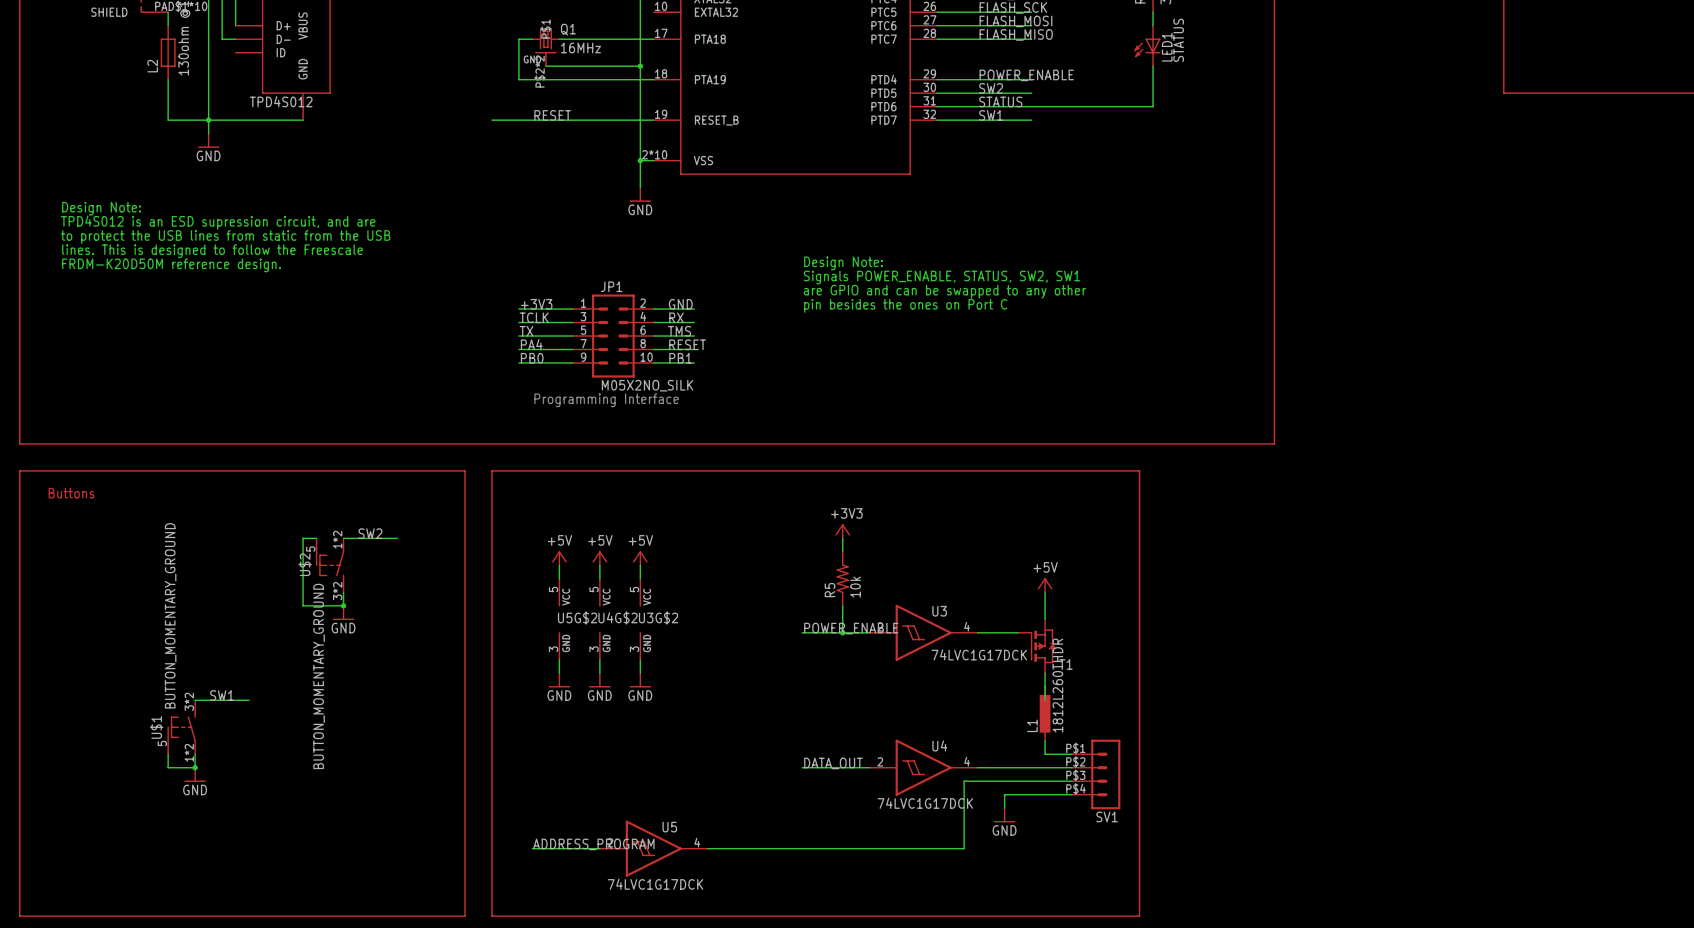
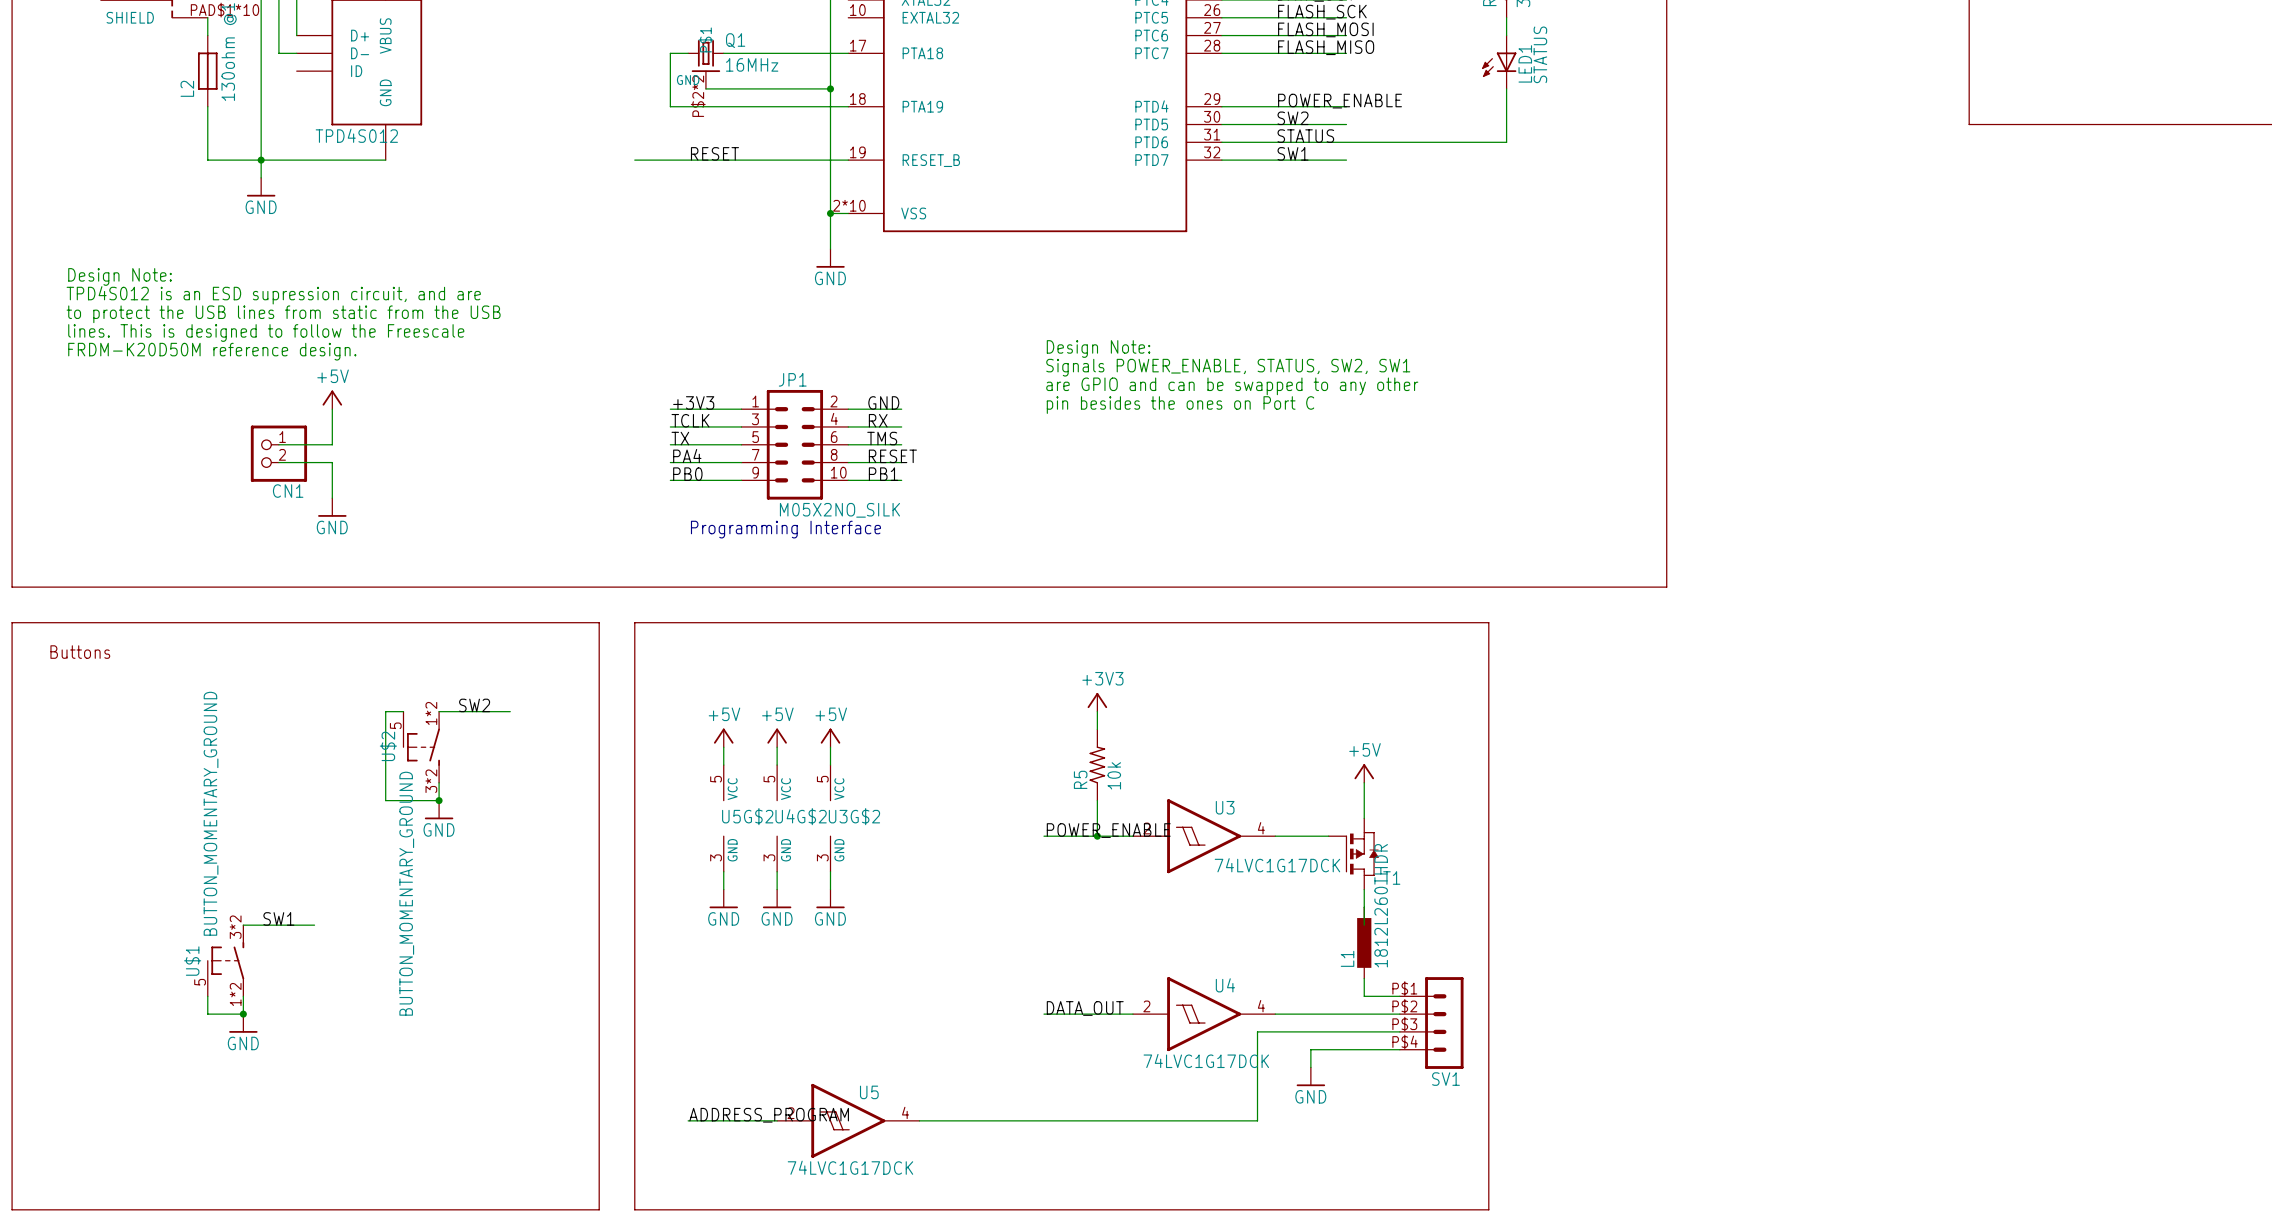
power symbol: none -> +5V (332, 399)
wire: none -> (332, 409) (332, 444) (278, 444)
CN1: none -> (278, 453)
wire: none -> (278, 462) (332, 462) (332, 498)
power symbol: none -> GND (332, 507)

